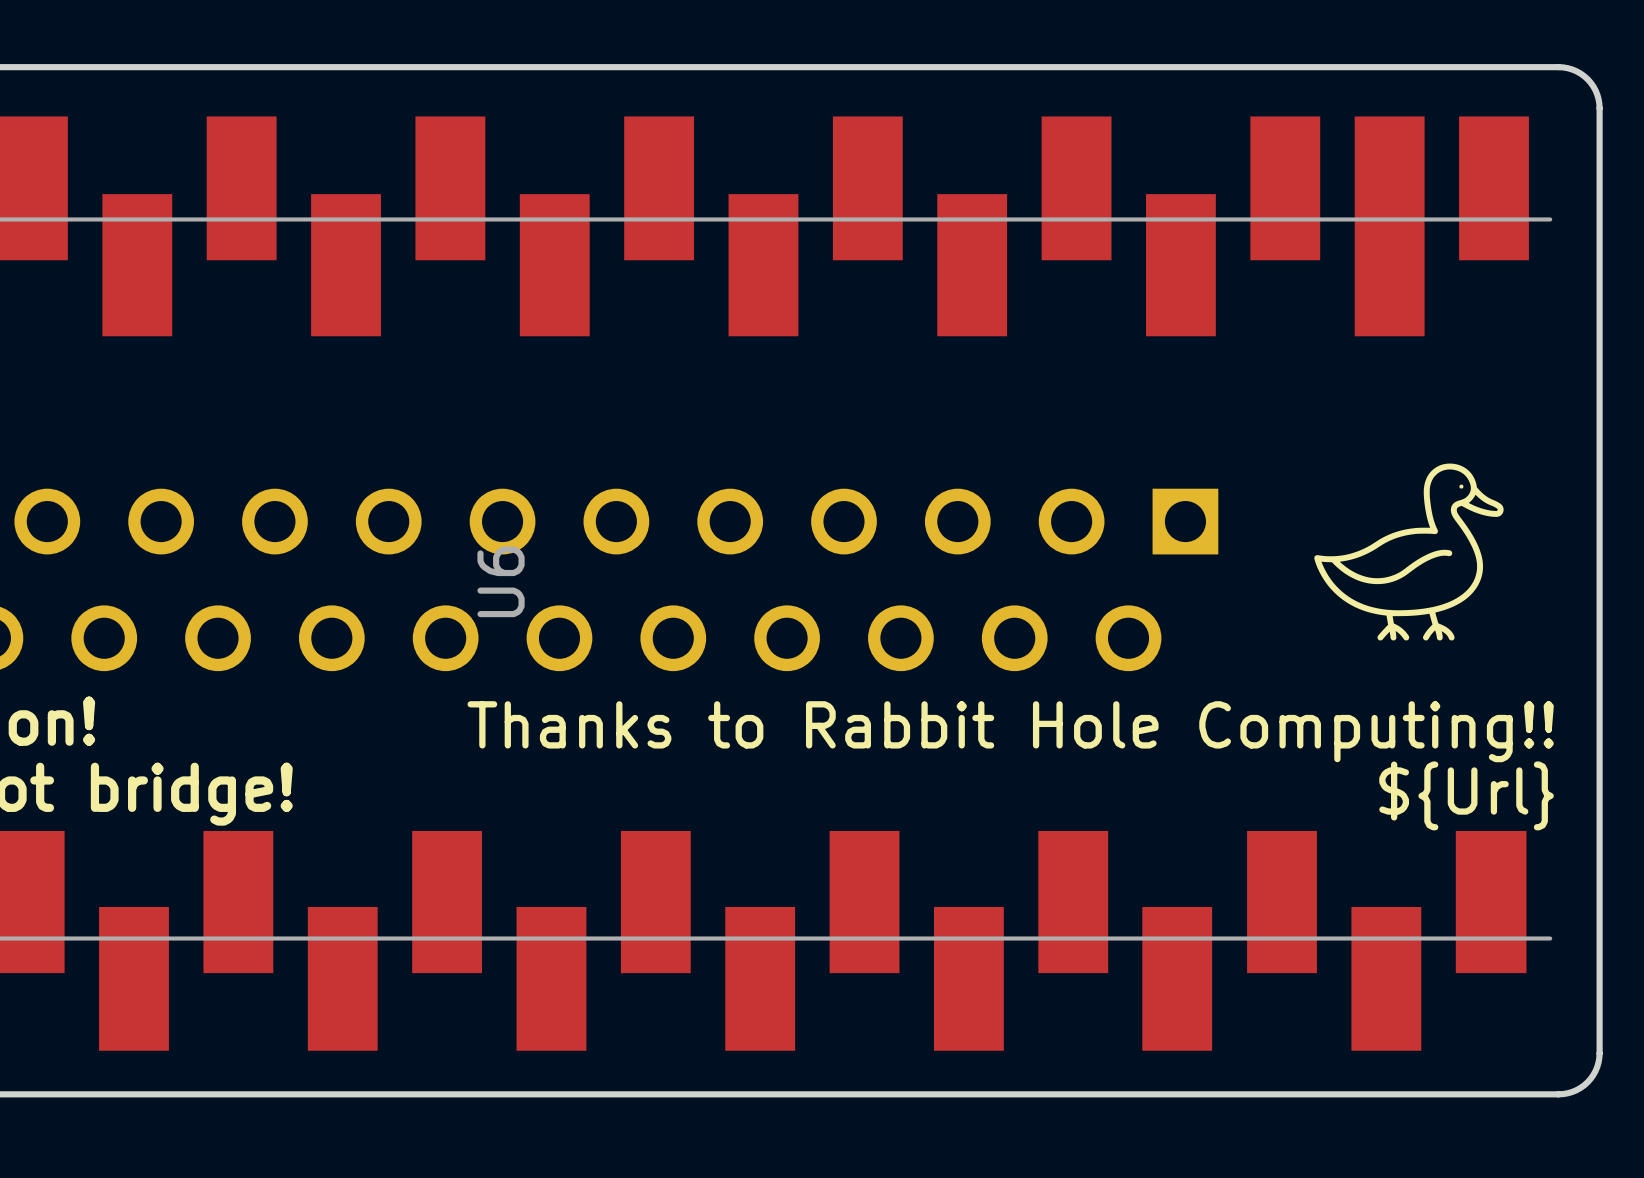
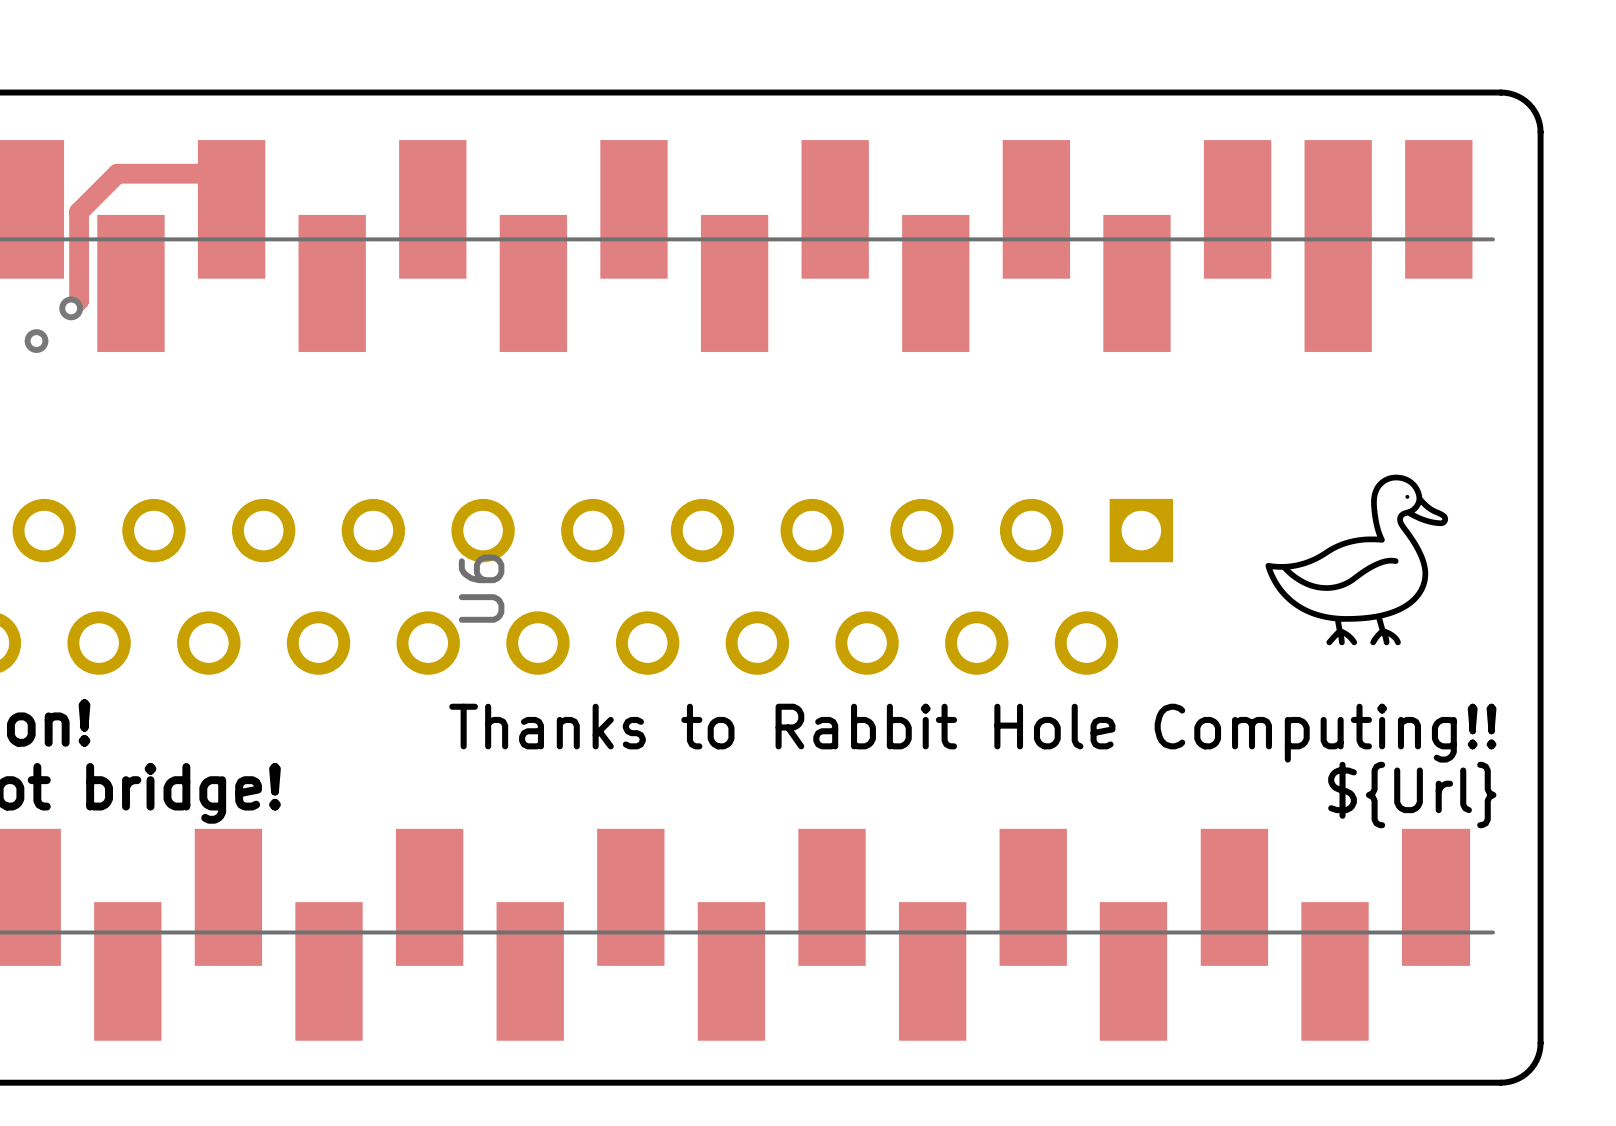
track: none -> (231, 173) (117, 173) (79, 212) (79, 300) (71, 308)
via: none -> (71, 308)
via: none -> (36, 341)

